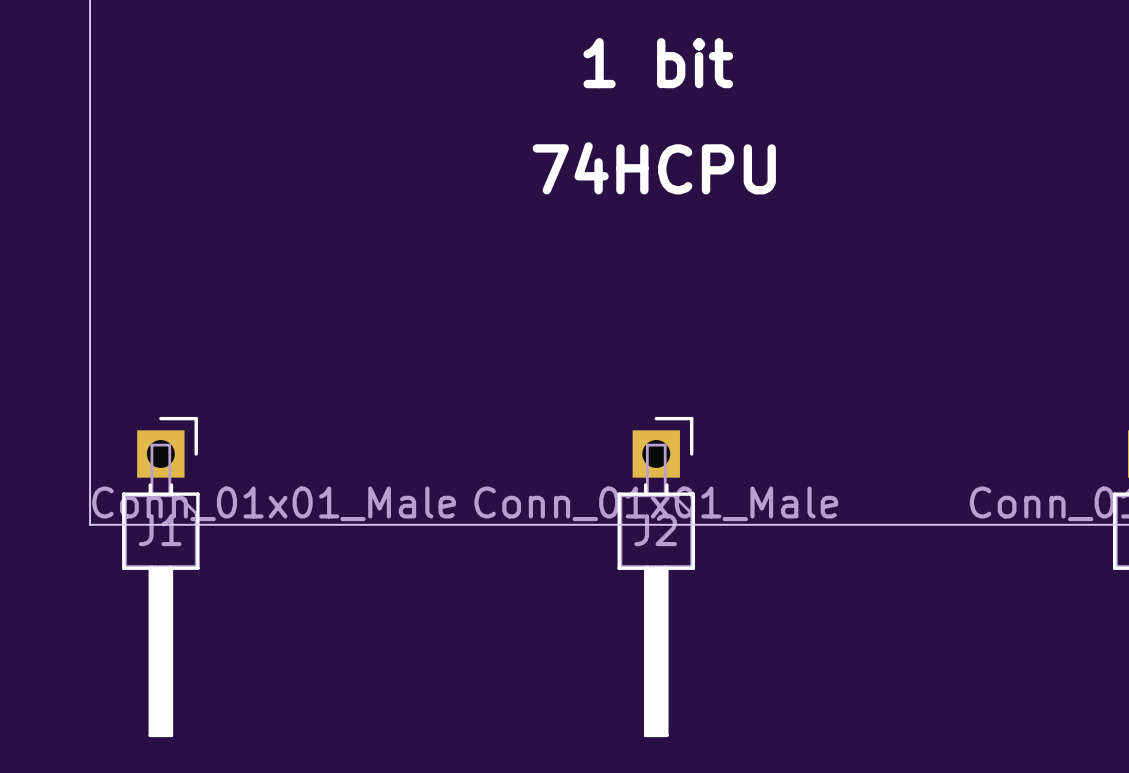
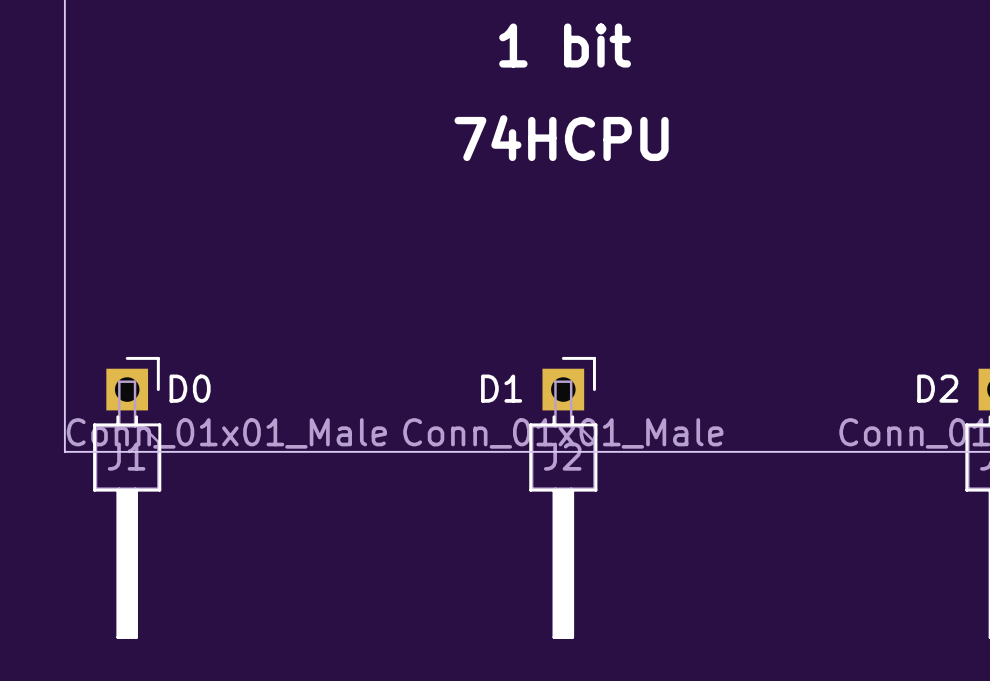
text: none -> D0 (190, 388)
text: none -> D1 (501, 388)
text: none -> D2 (937, 388)

